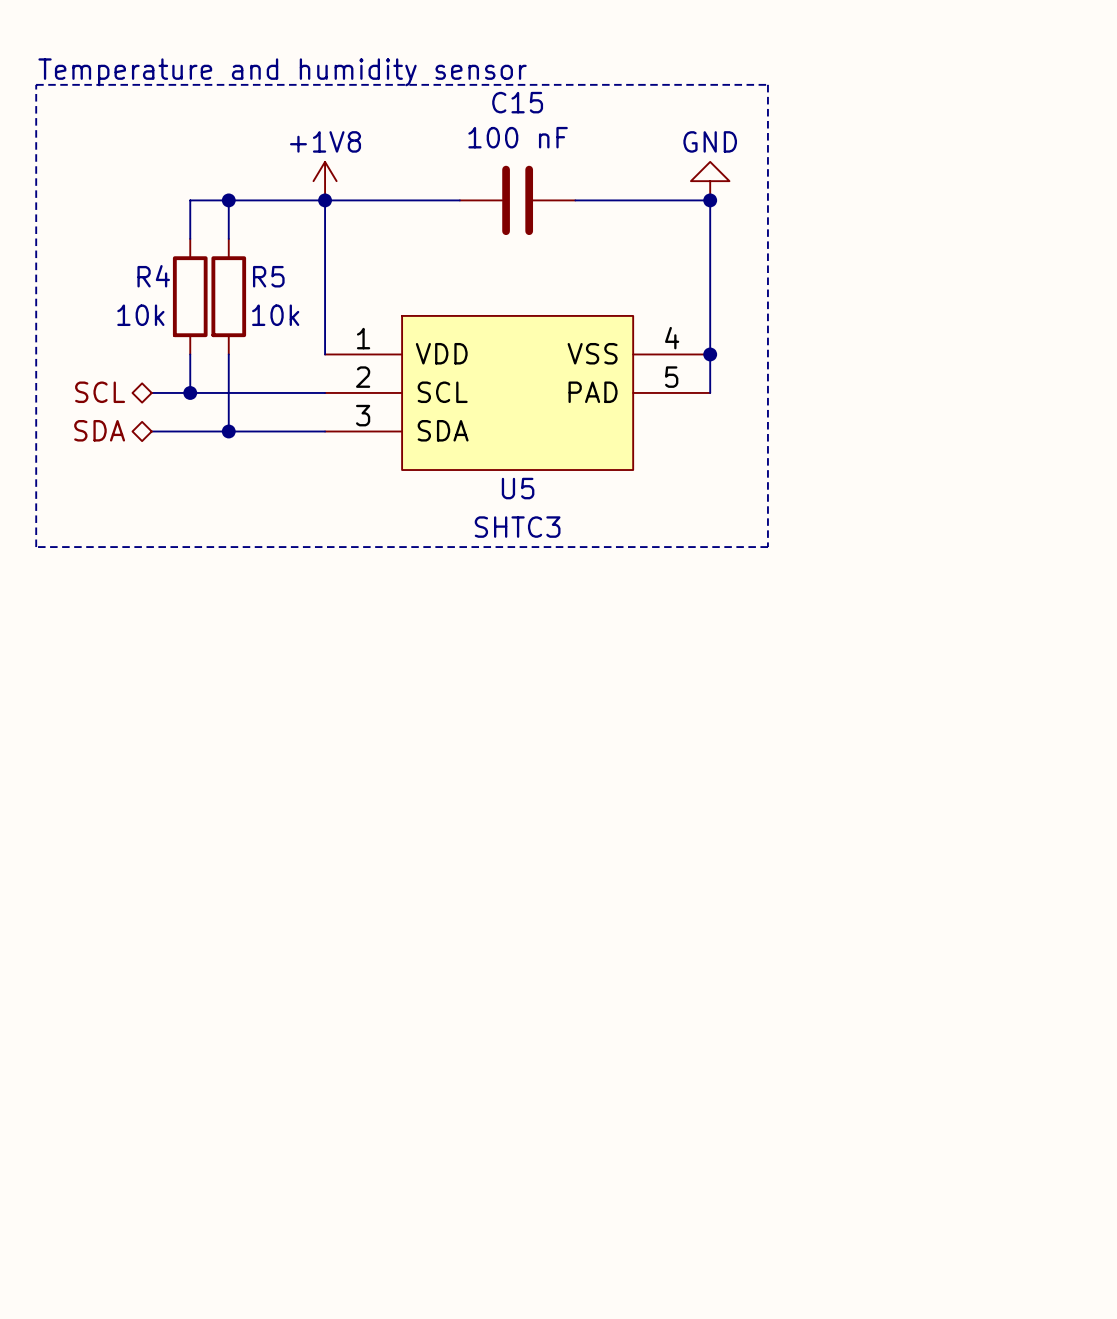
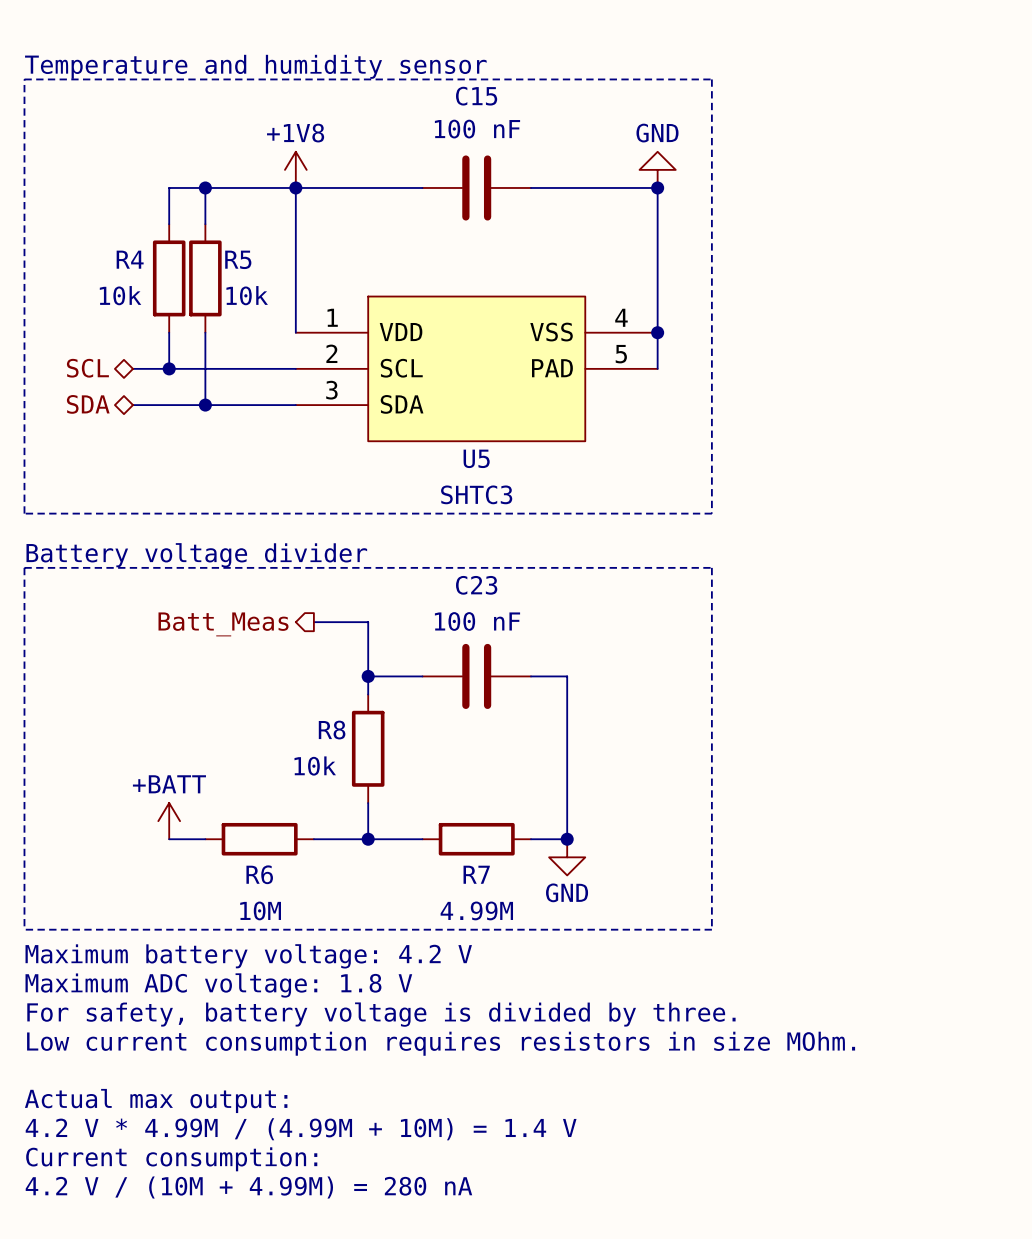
text: none -> Battery voltage divider (196, 555)
line: none -> (24, 567) (711, 567) (711, 929) (24, 929) (24, 567)
hierarchical label: none -> Batt_Meas (223, 624)
wire: none -> (313, 622) (368, 622) (368, 694)
wire: none -> (368, 676) (422, 676)
junction: none -> (368, 676)
C23: none -> 100 nF (476, 676)
wire: none -> (531, 676) (567, 676) (567, 839) (531, 839)
R8: none -> 10k (368, 748)
wire: none -> (368, 803) (368, 839)
power symbol: none -> +BATT (169, 821)
wire: none -> (169, 839) (205, 839)
R6: none -> 10M (259, 839)
wire: none -> (313, 839) (422, 839)
junction: none -> (368, 839)
R7: none -> 4.99M (476, 839)
junction: none -> (567, 839)
power symbol: none -> GND (567, 857)
text: none -> Maximum battery voltage: 4.2 V (248, 956)
text: none -> Maximum ADC voltage: 1.8 V (218, 985)
text: none -> For safety, battery voltage is divided by three. (381, 1014)
text: none -> Low current consumption requires resistors in size MOhm. (441, 1043)
text: none -> Actual max output: (156, 1100)
text: none -> 4.2 V * 4.99M / (4.99M + 10M) = 1.4 V (301, 1129)
text: none -> Current consumption: (171, 1159)
text: none -> 4.2 V / (10M + 4.99M) = 280 nA (248, 1187)

